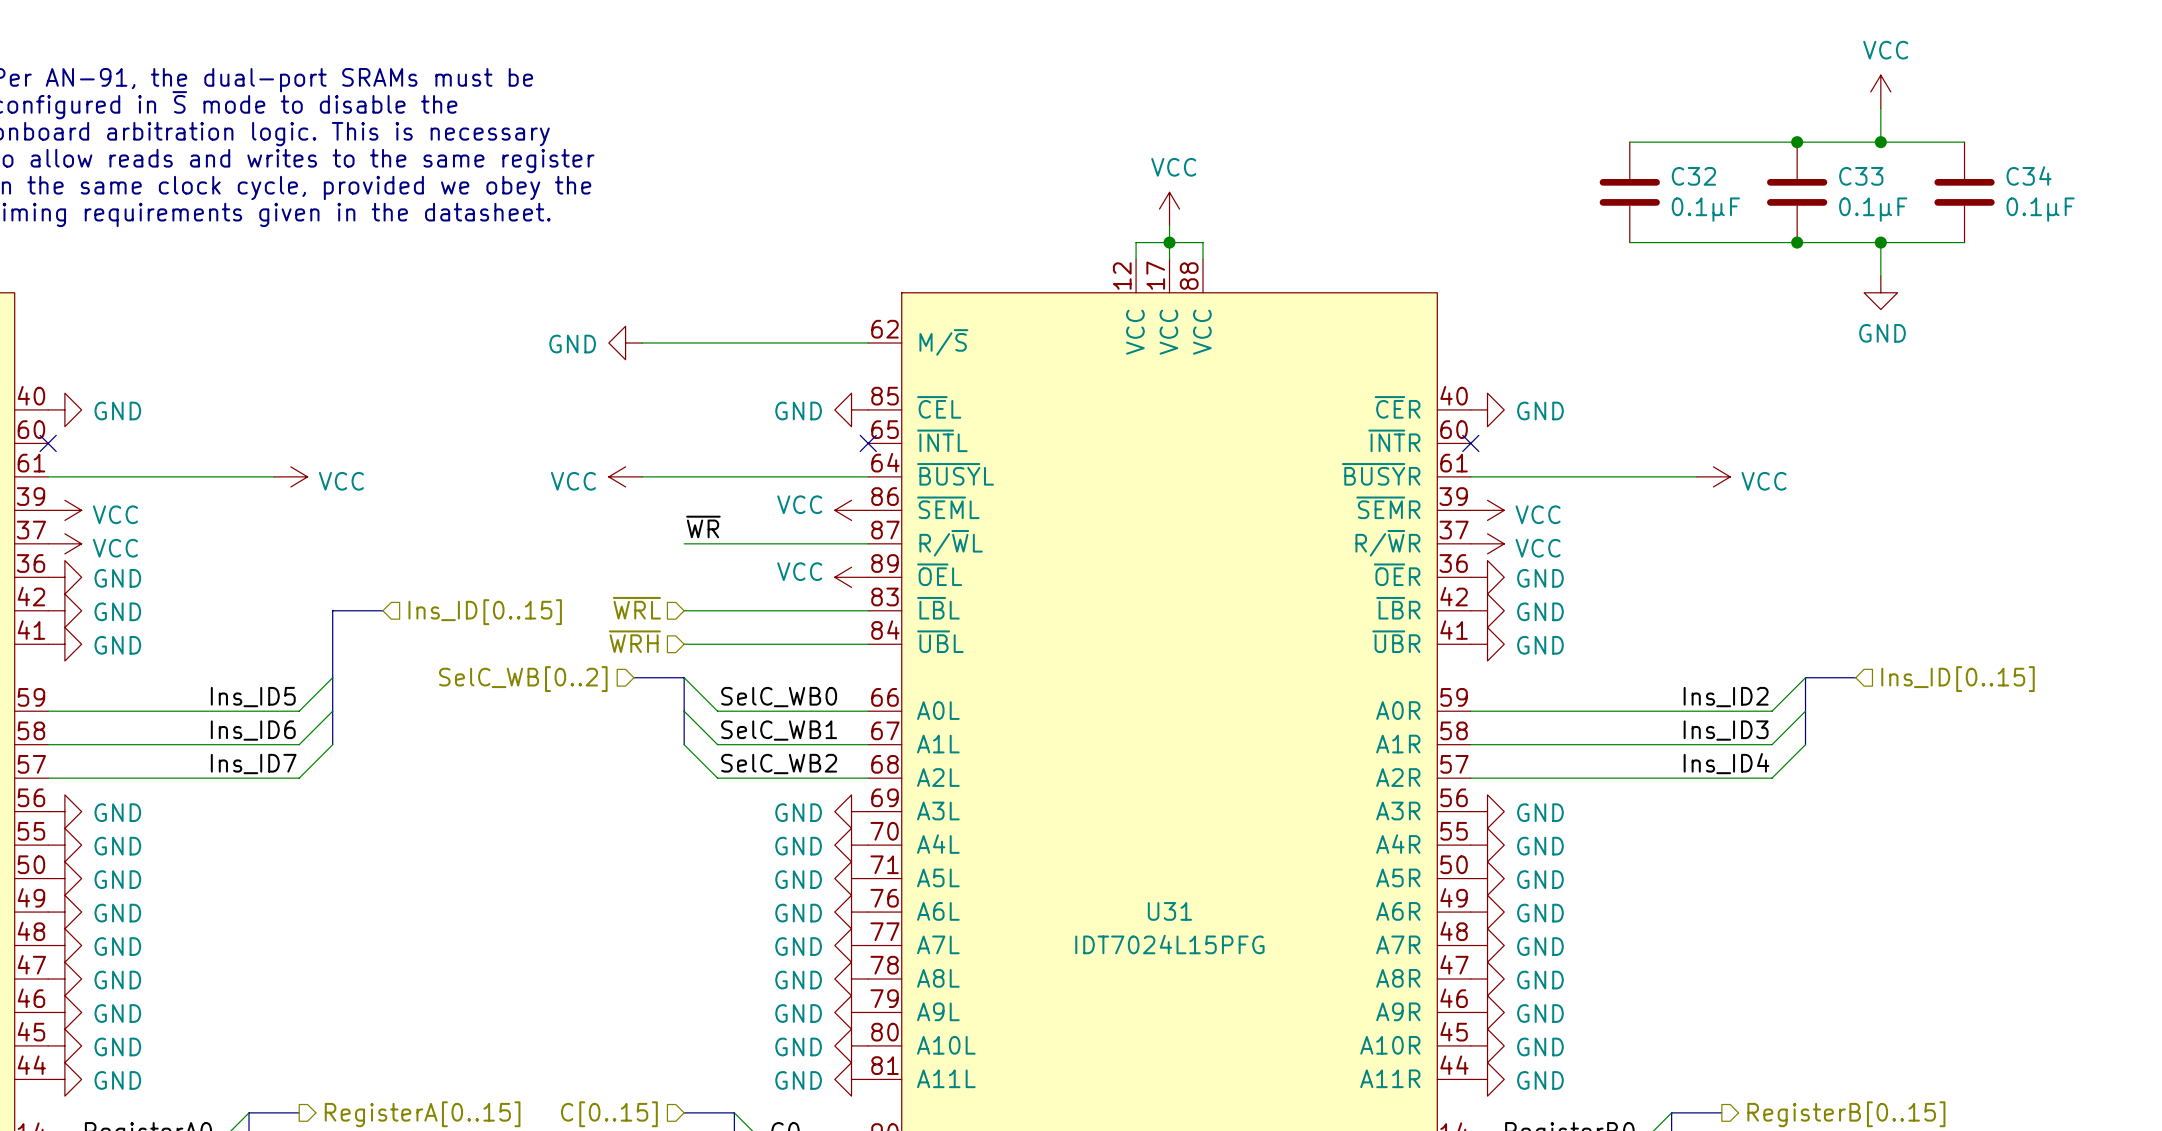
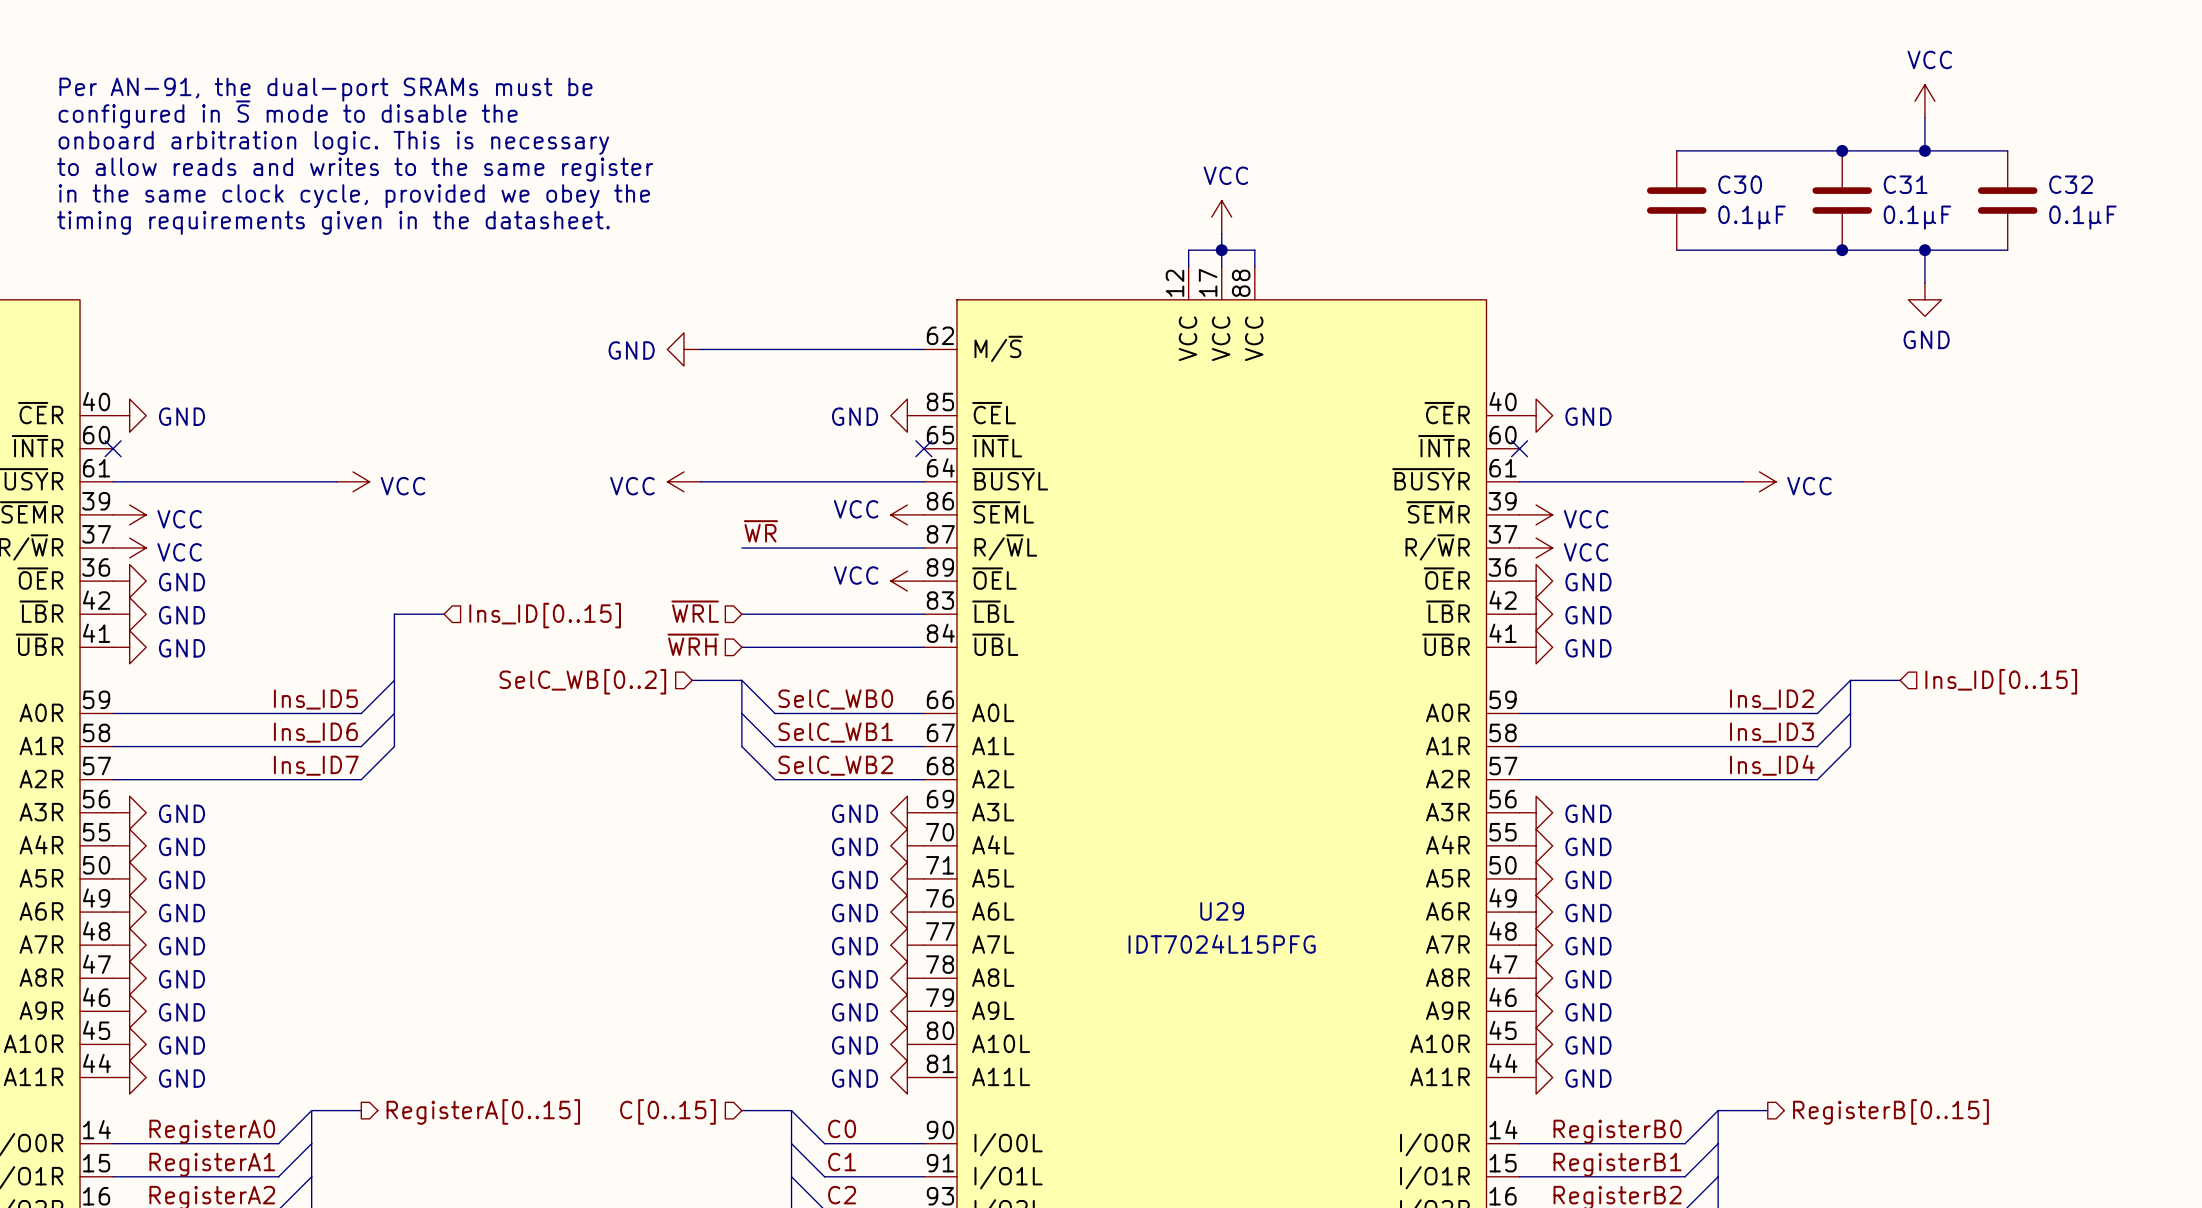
C34 name: C34 (2029, 175) -> C32 (2071, 184)
C32 name: C32 (1693, 176) -> C30 (1740, 184)
C33 name: C33 (1861, 176) -> C31 (1905, 184)
U31 name: U31 (1169, 911) -> U29 (1222, 911)

